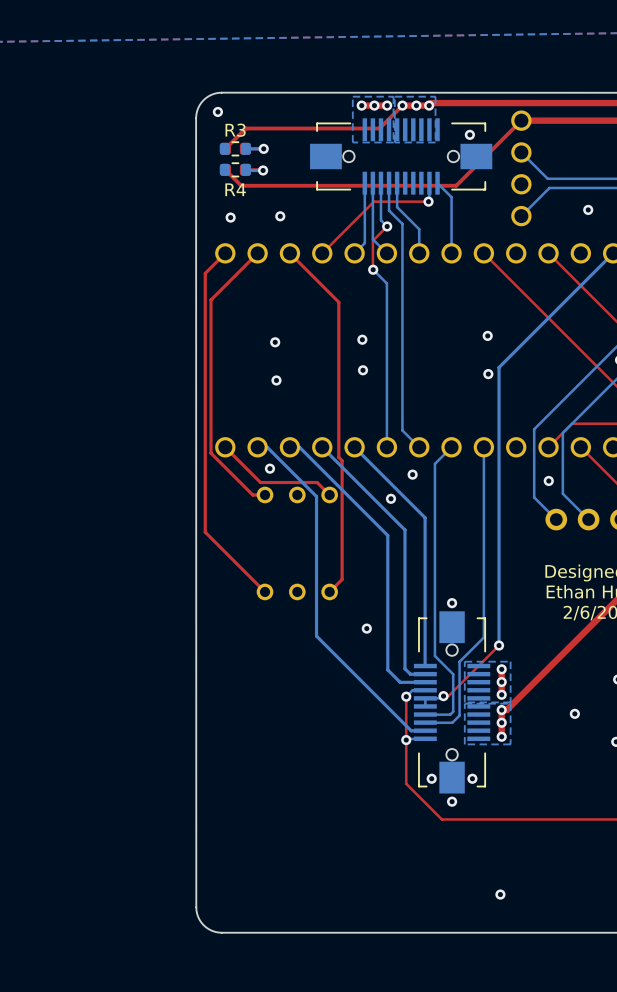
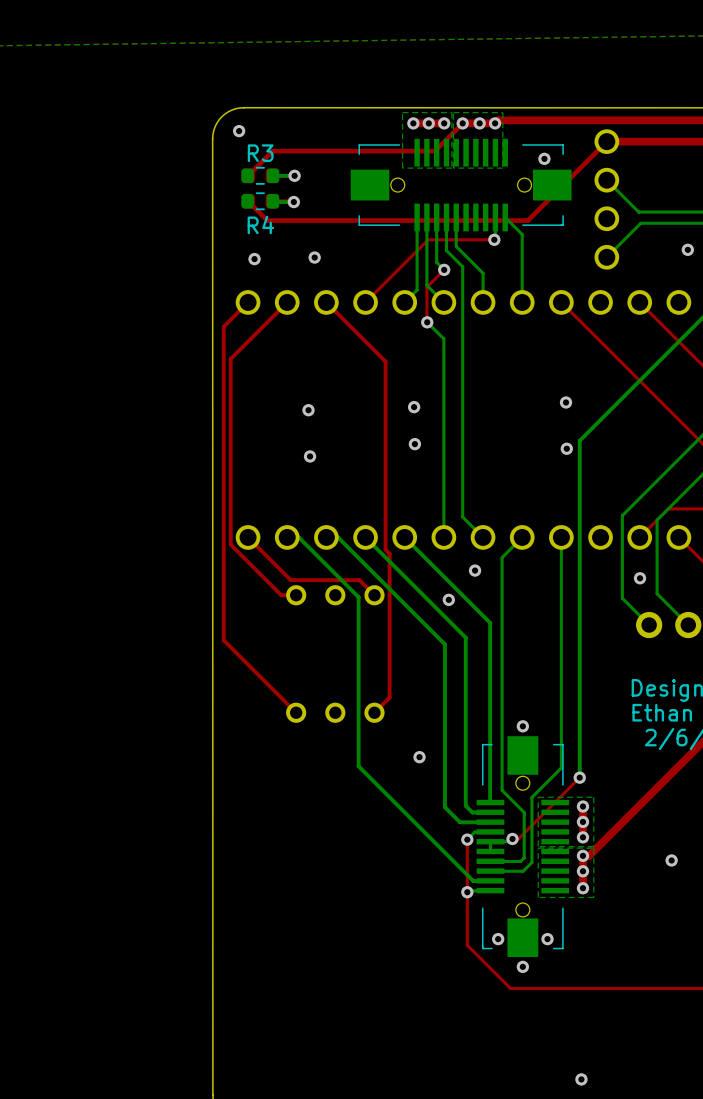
via: (269, 468) -> none

